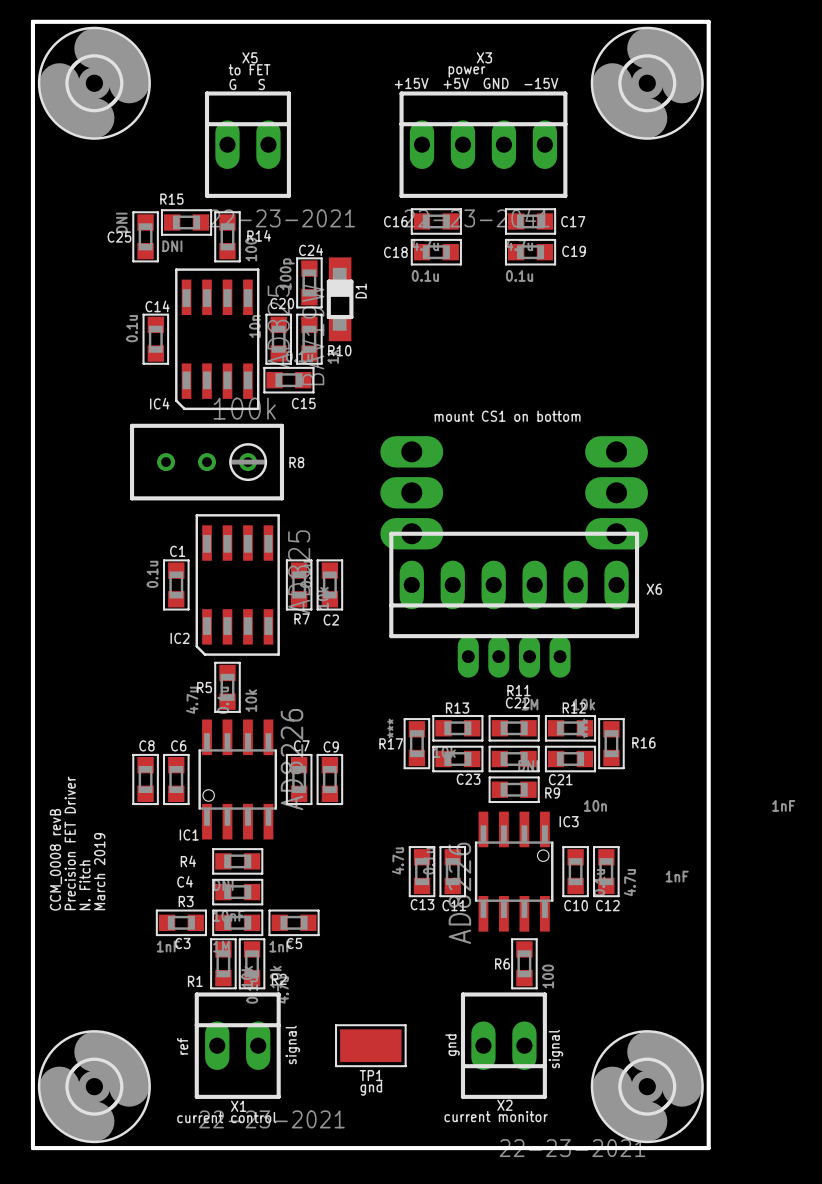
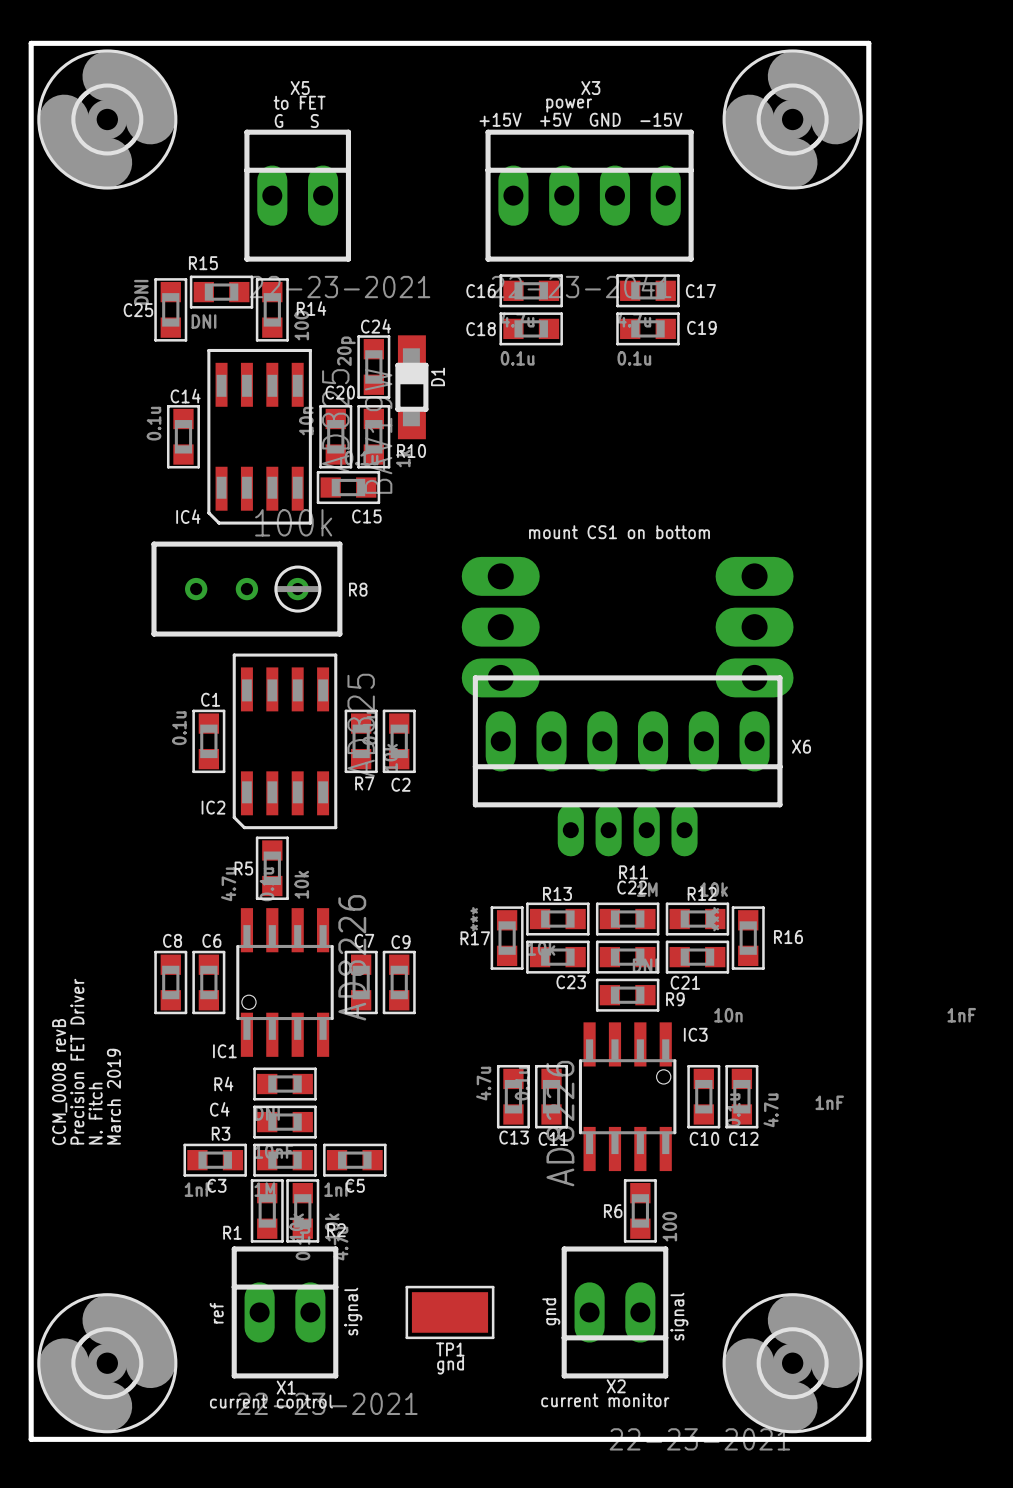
C24 value: 100p (287, 274) -> 20p (346, 351)

